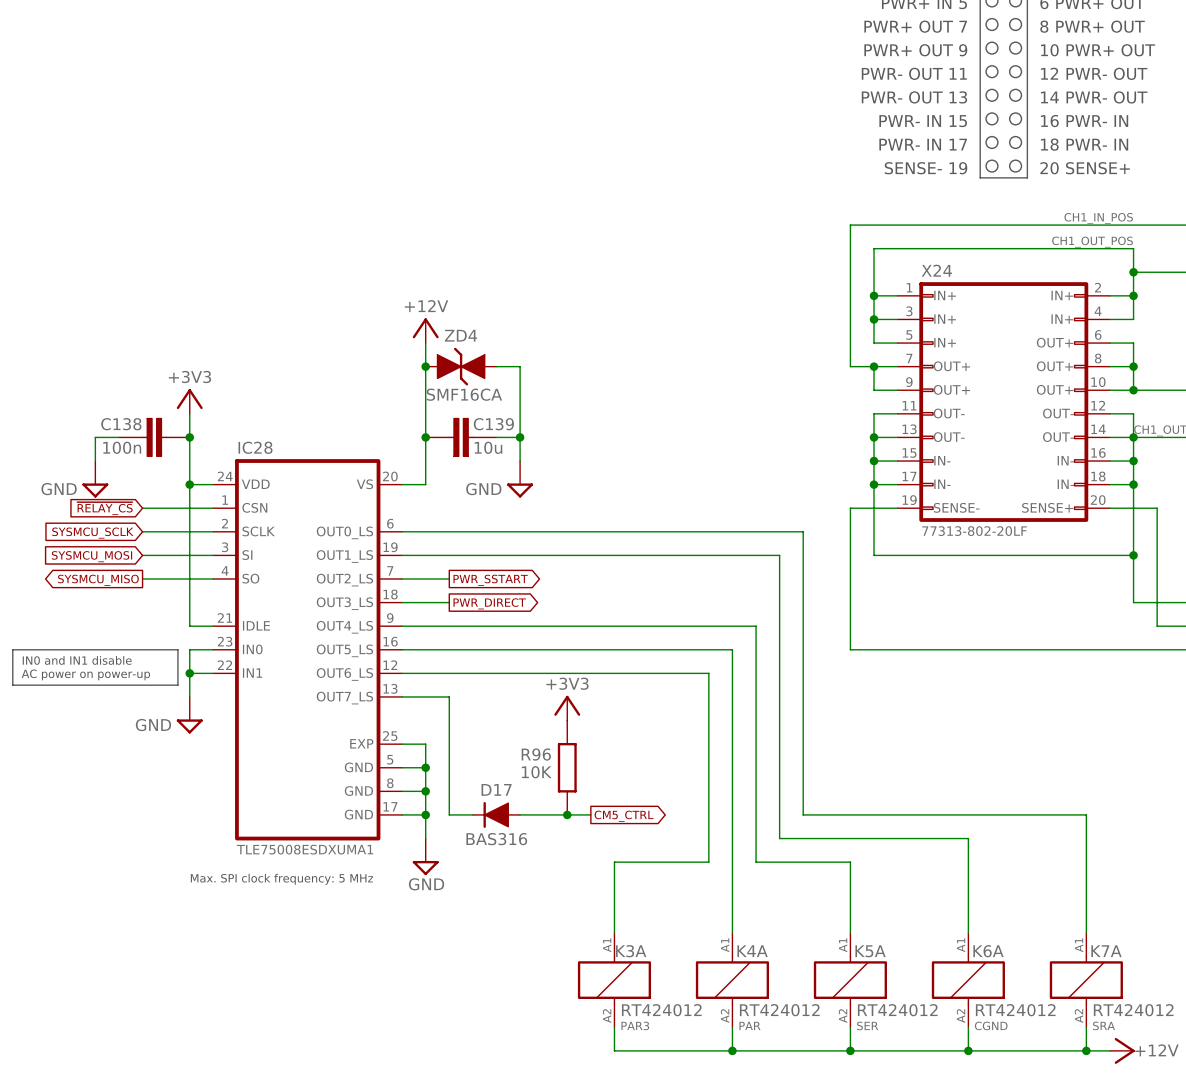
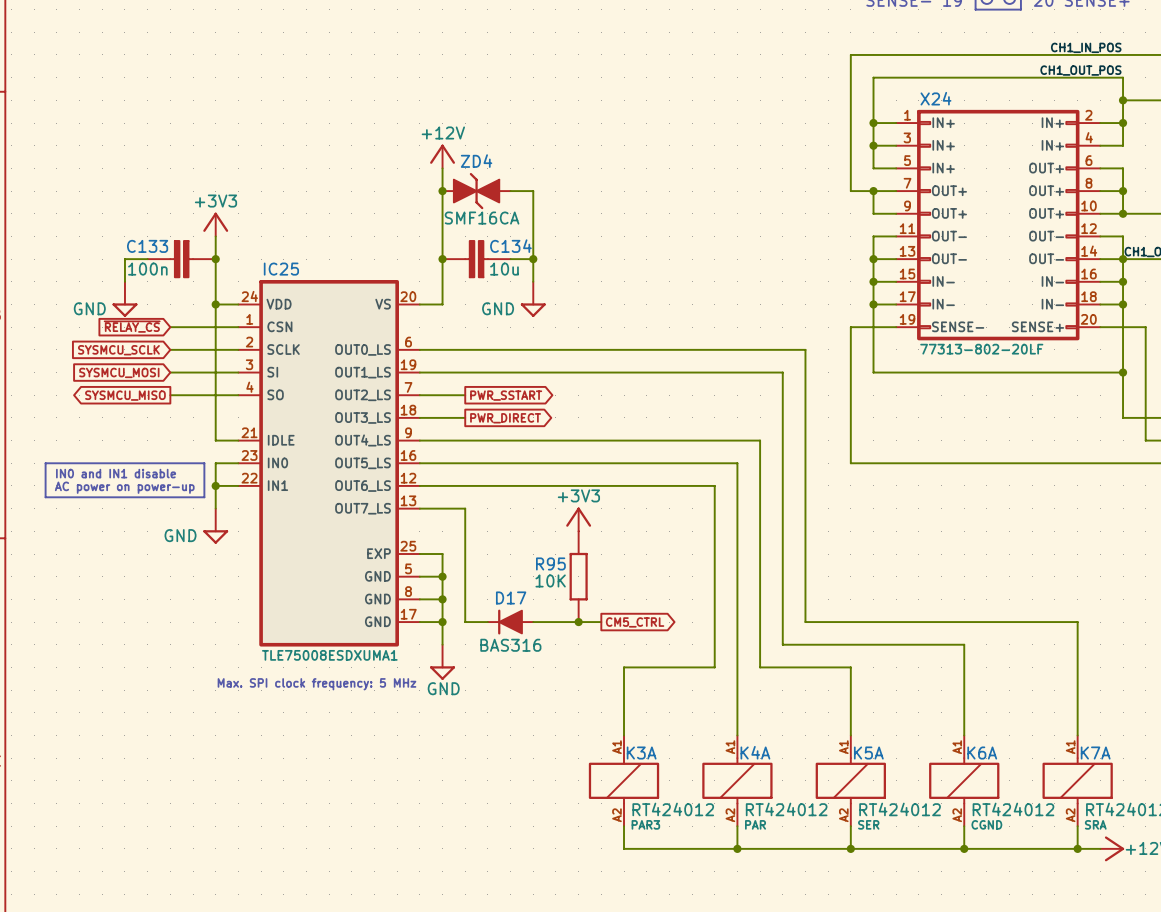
C138 name: C138 (121, 424) -> C133 (147, 246)
C139 name: C139 (493, 424) -> C134 (510, 246)
IC28 name: IC28 (255, 447) -> IC25 (281, 269)
R96 name: R96 (536, 754) -> R95 (550, 563)

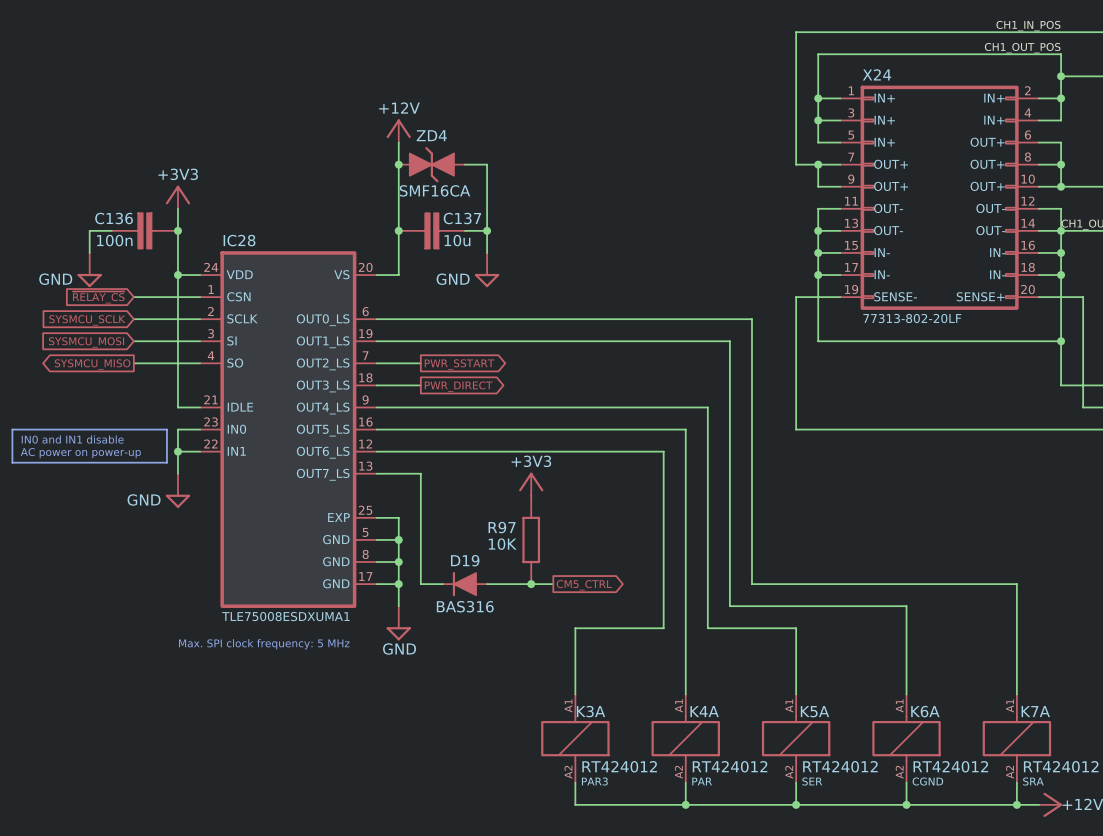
C133 name: C133 (147, 246) -> C136 (114, 218)
C134 name: C134 (510, 246) -> C137 (462, 218)
IC25 name: IC25 (281, 269) -> IC28 (239, 240)
R95 name: R95 (550, 563) -> R97 (502, 527)
D17 name: D17 (511, 597) -> D19 (465, 560)

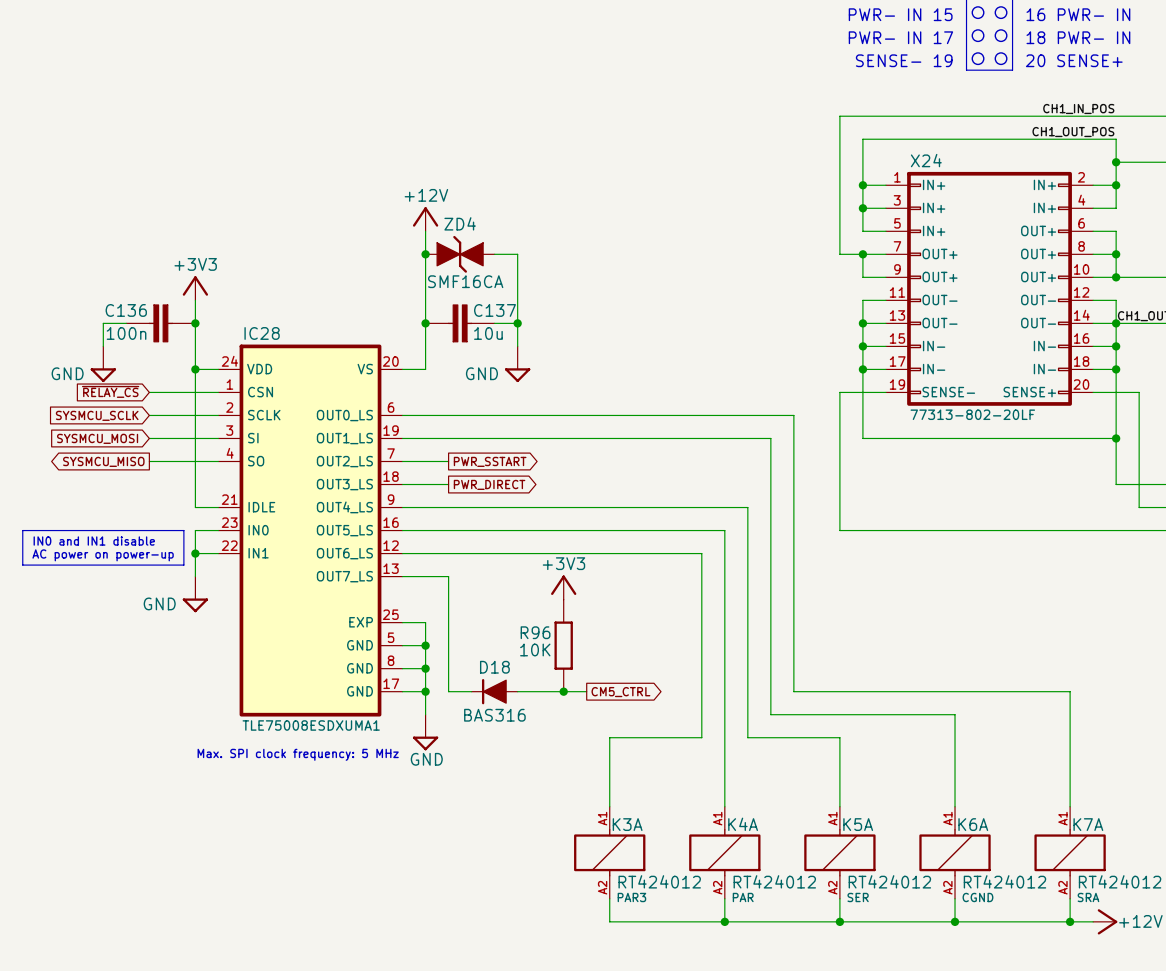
R97 name: R97 (502, 527) -> R96 (535, 632)
D19 name: D19 (465, 560) -> D18 (494, 667)

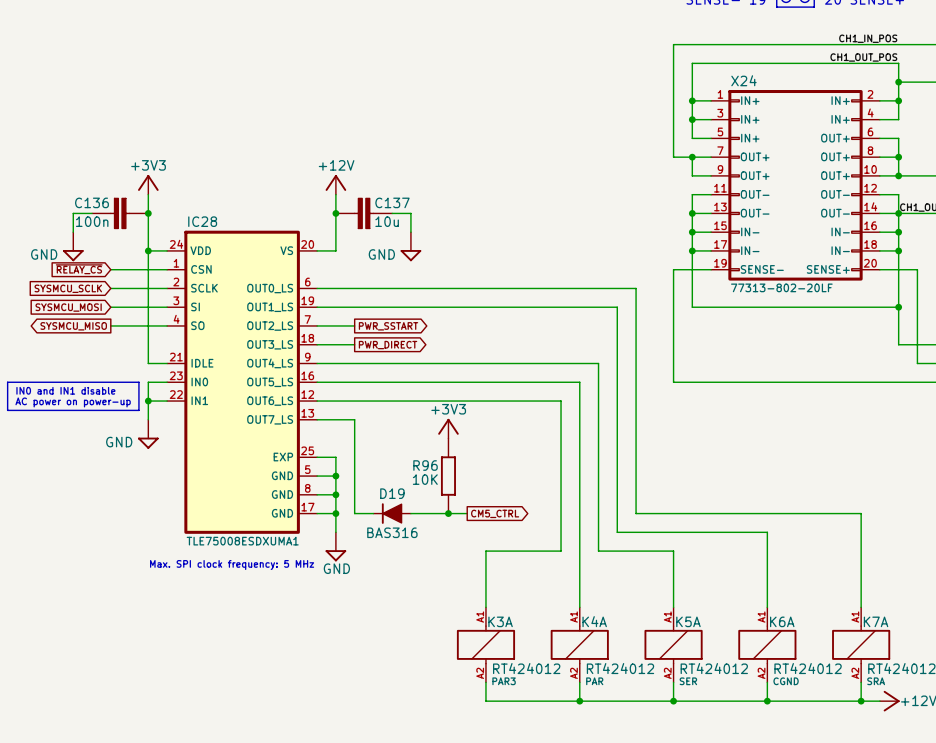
power symbol position: +12V (425, 219) -> +12V (335, 184)
wire: (425, 231) (425, 300) -> none
junction: (425, 254) -> none
ZD4: SMF16CA (460, 254) -> none
wire: (494, 254) (517, 254) (517, 323) -> none
junction: (517, 323) -> none
D18 name: D18 (494, 667) -> D19 (392, 493)

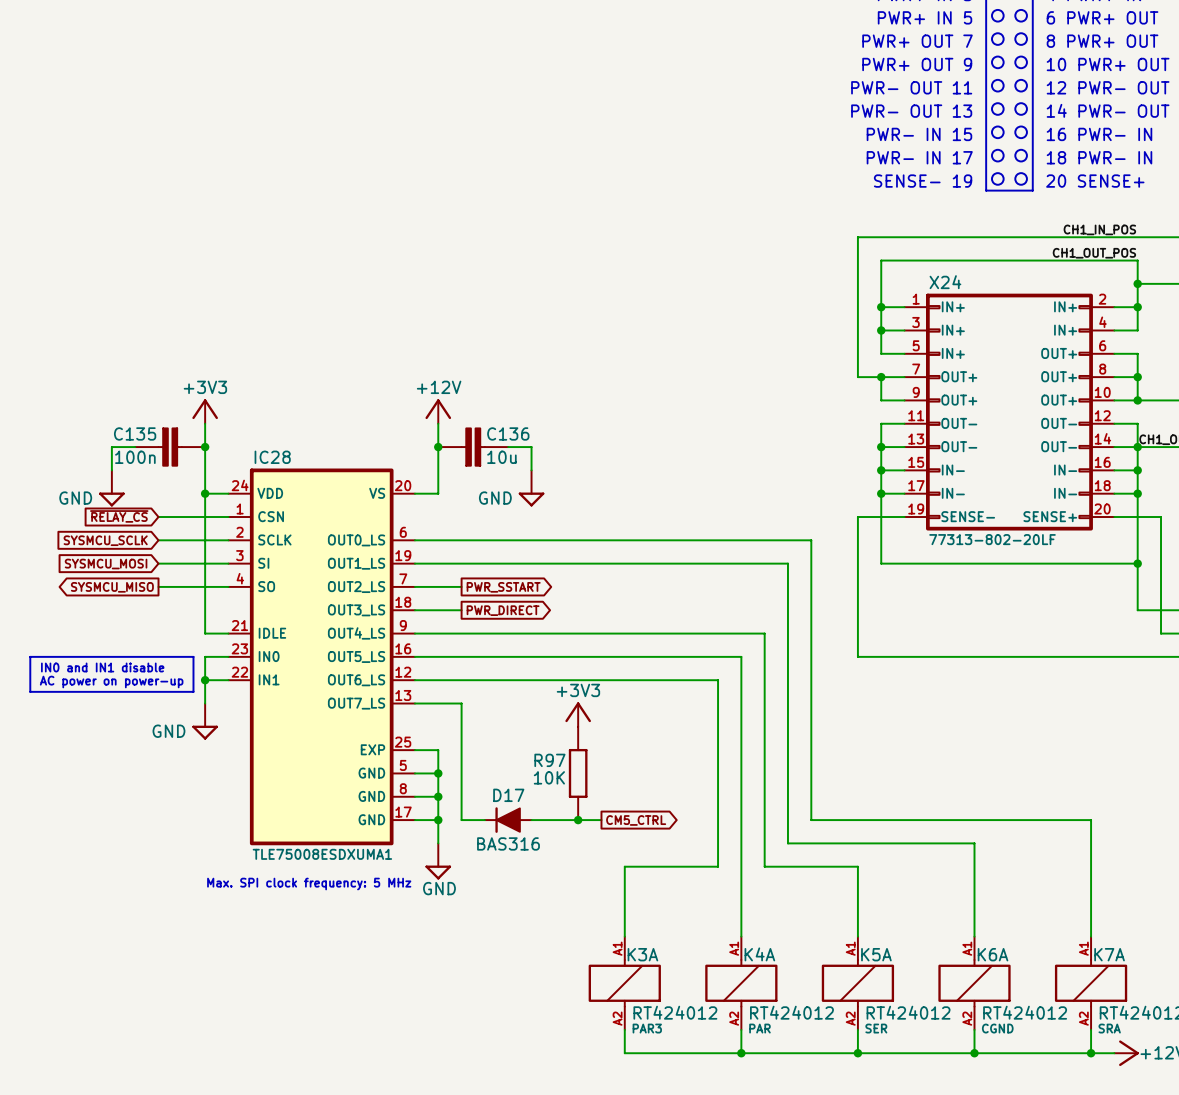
C136 name: C136 (91, 202) -> C135 (135, 433)
C137 name: C137 (392, 202) -> C136 (508, 433)
R96 name: R96 (425, 465) -> R97 (549, 760)
D19 name: D19 (392, 493) -> D17 (508, 795)

